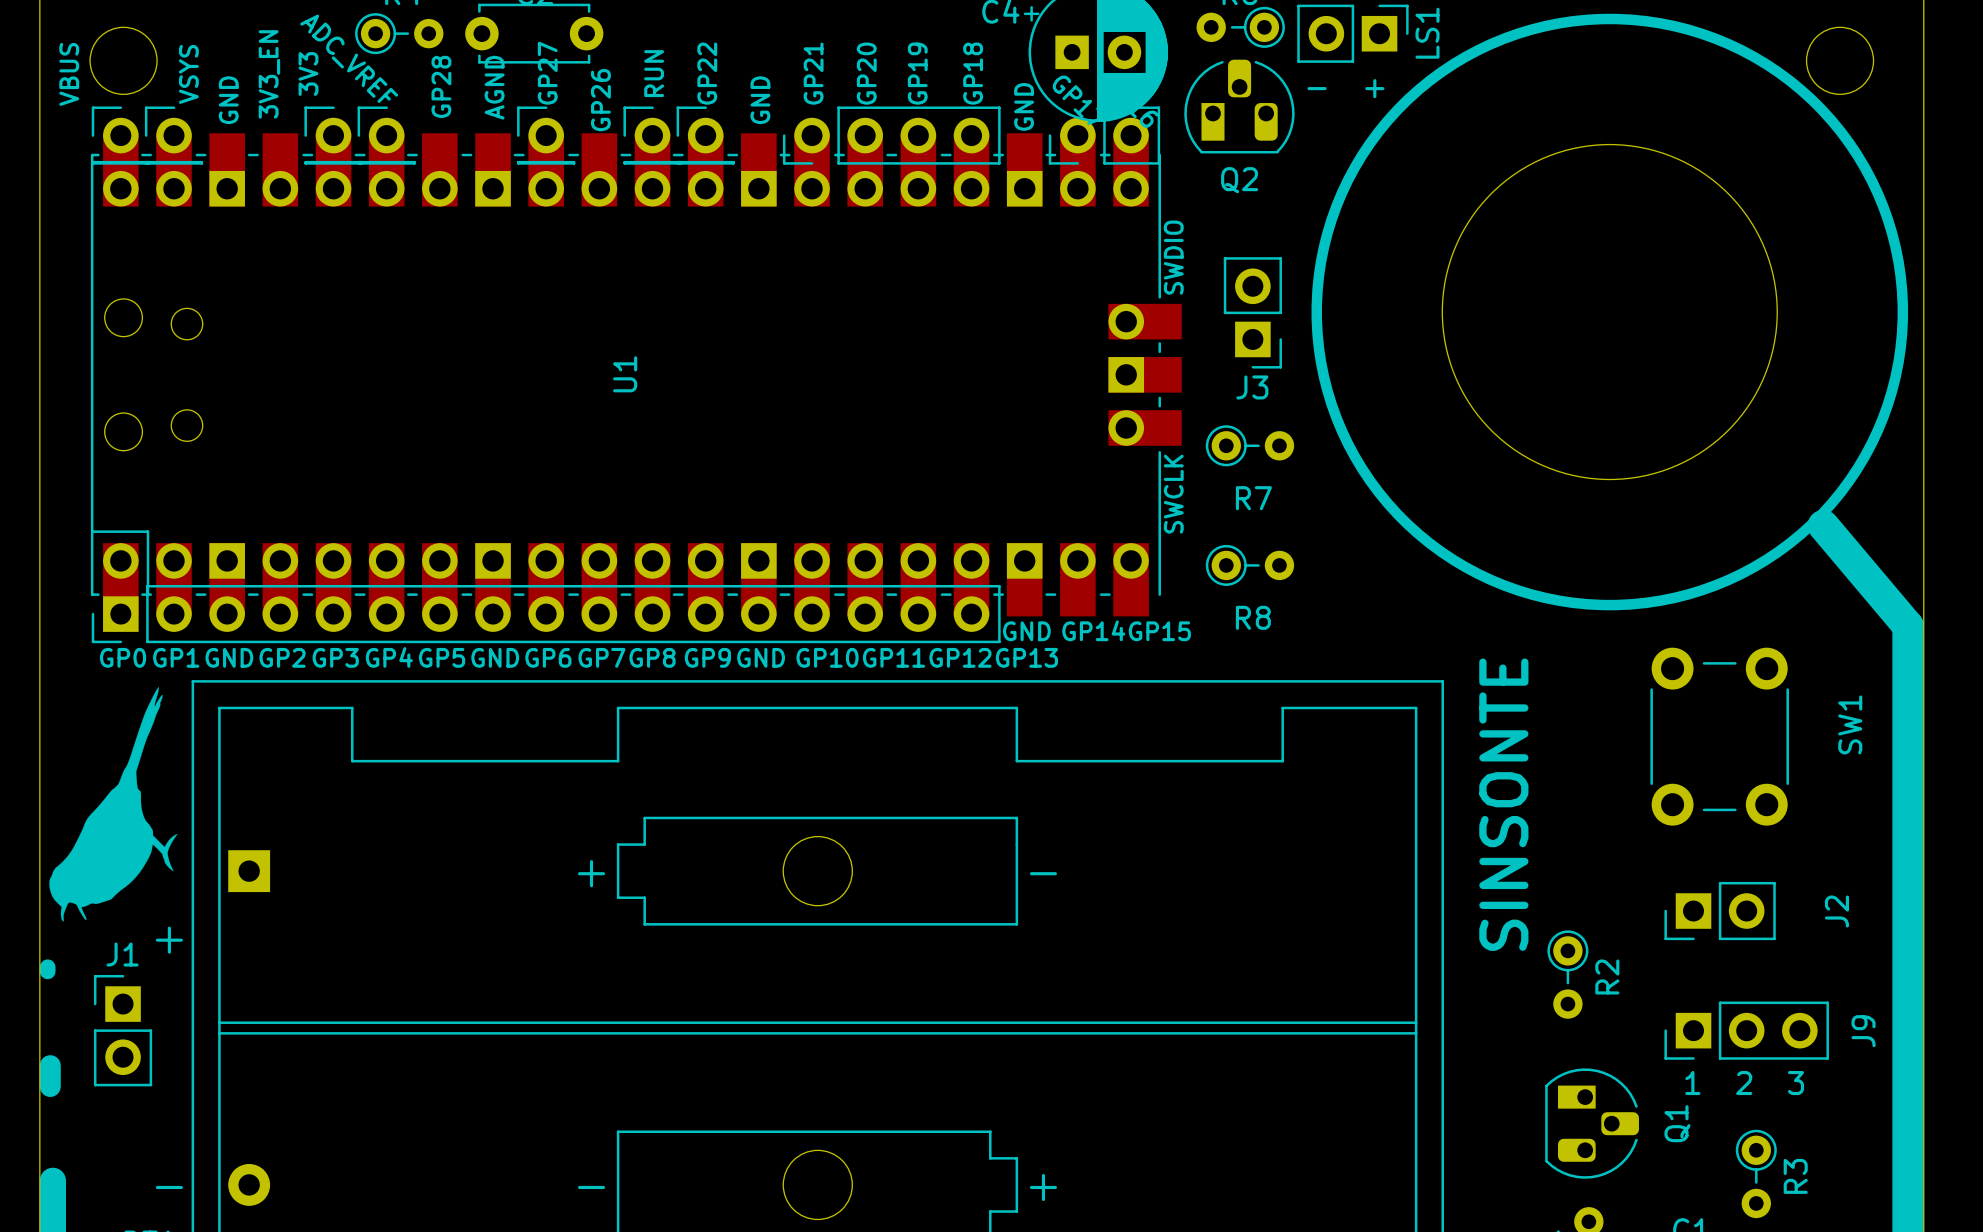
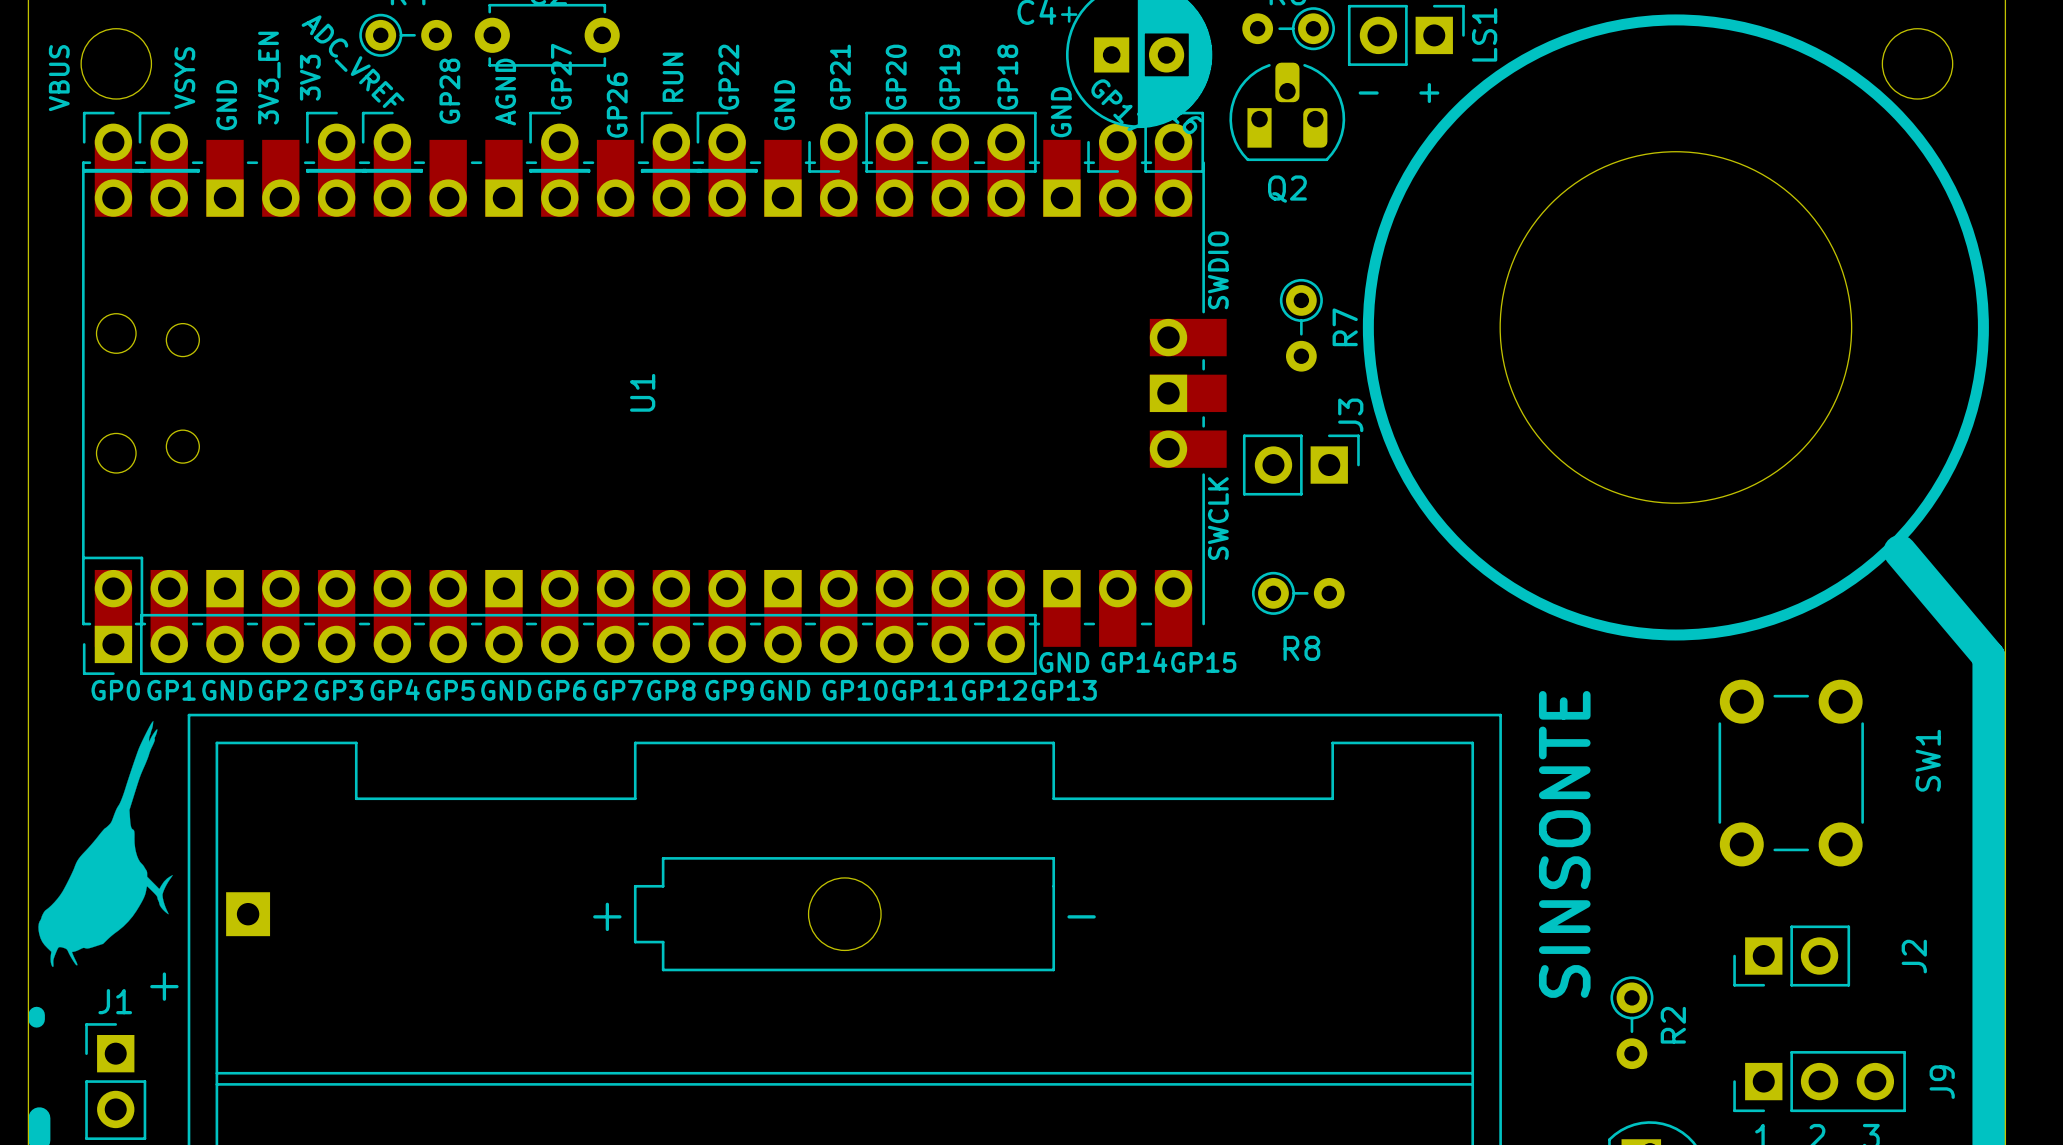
J3 rotation: 0° (1252, 312) -> 90° counterclockwise (1301, 465)
J3 position: (1252, 312) -> (1301, 465)
J3 name position: J3 (1252, 387) -> J3 (1350, 415)
R7 rotation: 0° (1249, 445) -> 90° clockwise (1301, 325)
R7 position: (1249, 445) -> (1301, 325)
R7 name position: R7 (1253, 498) -> R7 (1345, 327)

